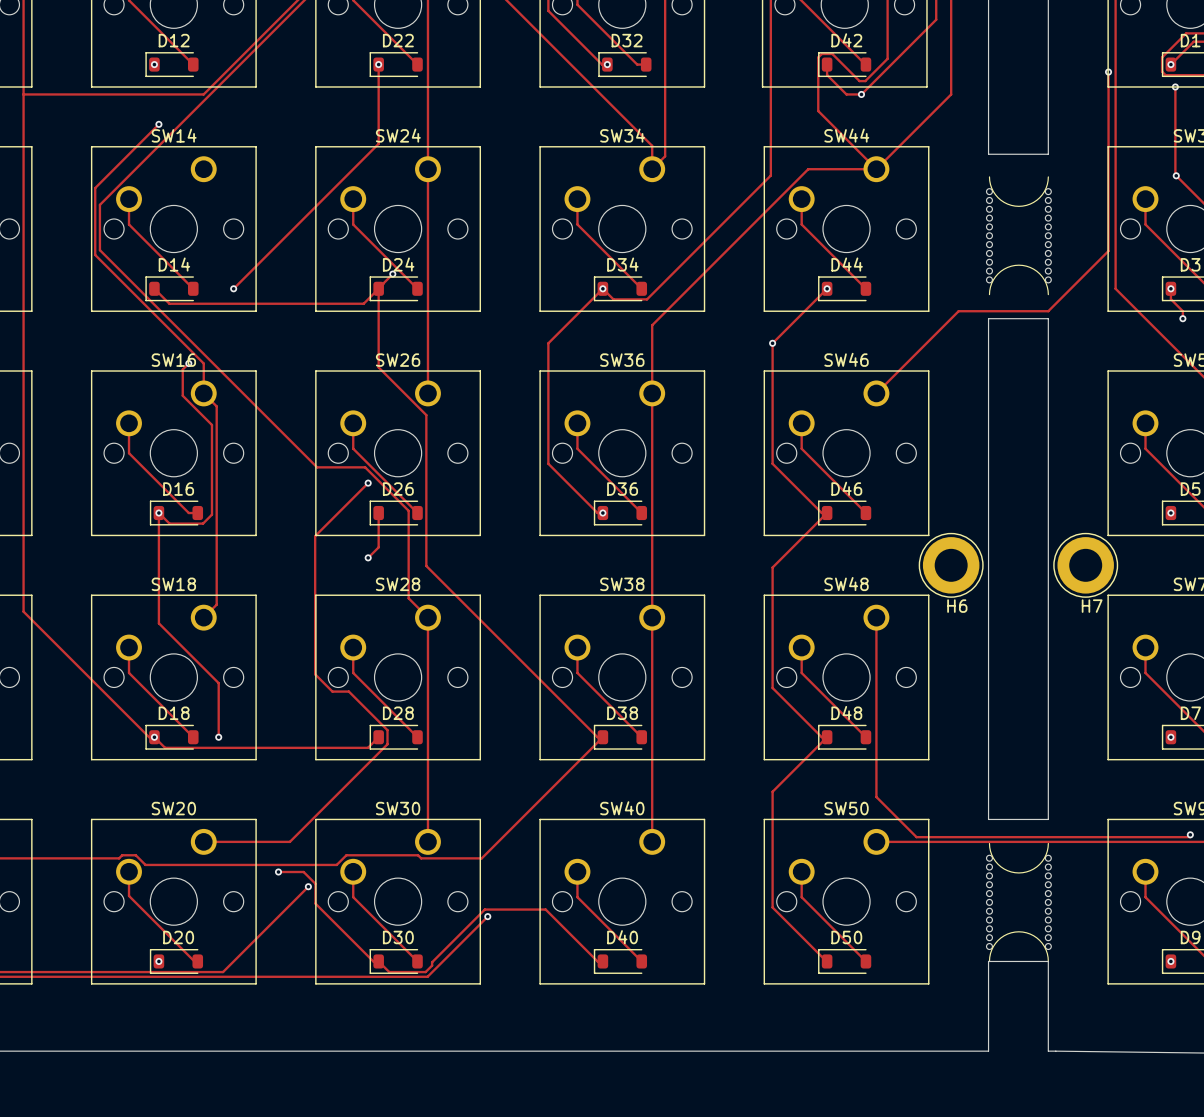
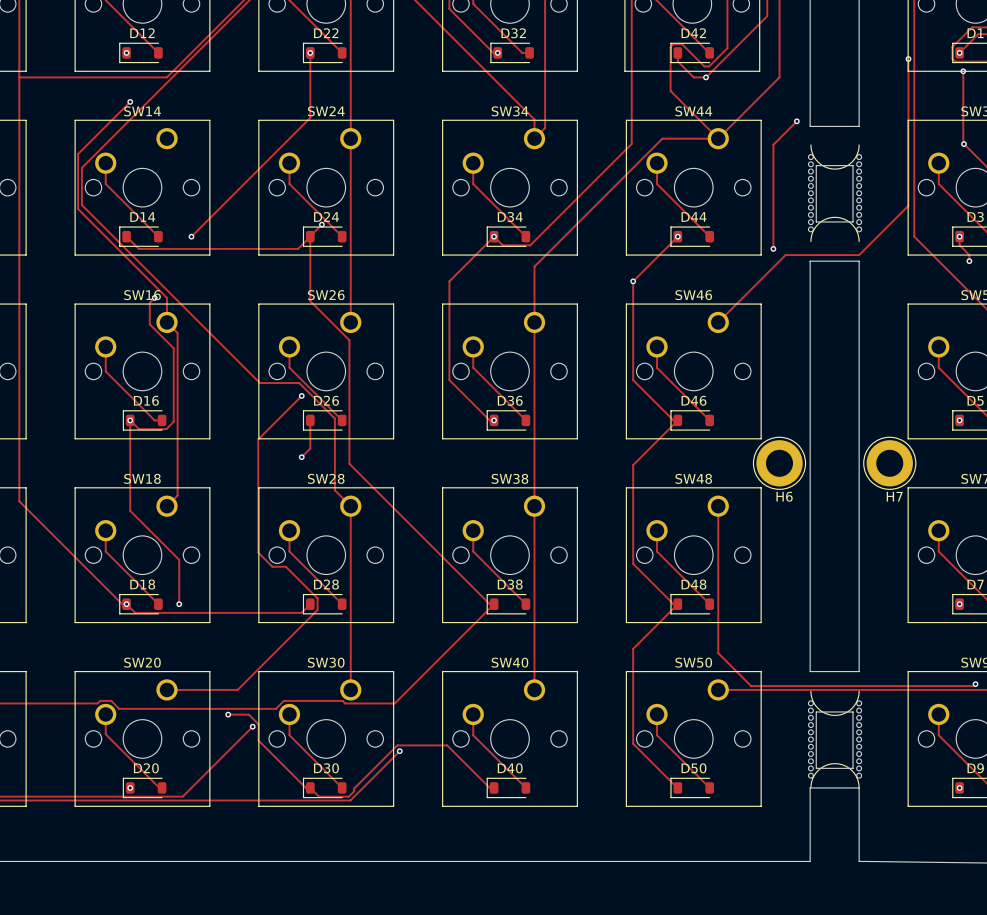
track: none -> (796, 121) (773, 144) (773, 248)
via: none -> (796, 121)
board edge: none -> (816, 165) (853, 165) (853, 221) (816, 221) (816, 165)
via: none -> (773, 248)
SW36 name: SW36 (622, 360) -> none
board edge: none -> (816, 712) (816, 768) (853, 768) (853, 712) (816, 712)

